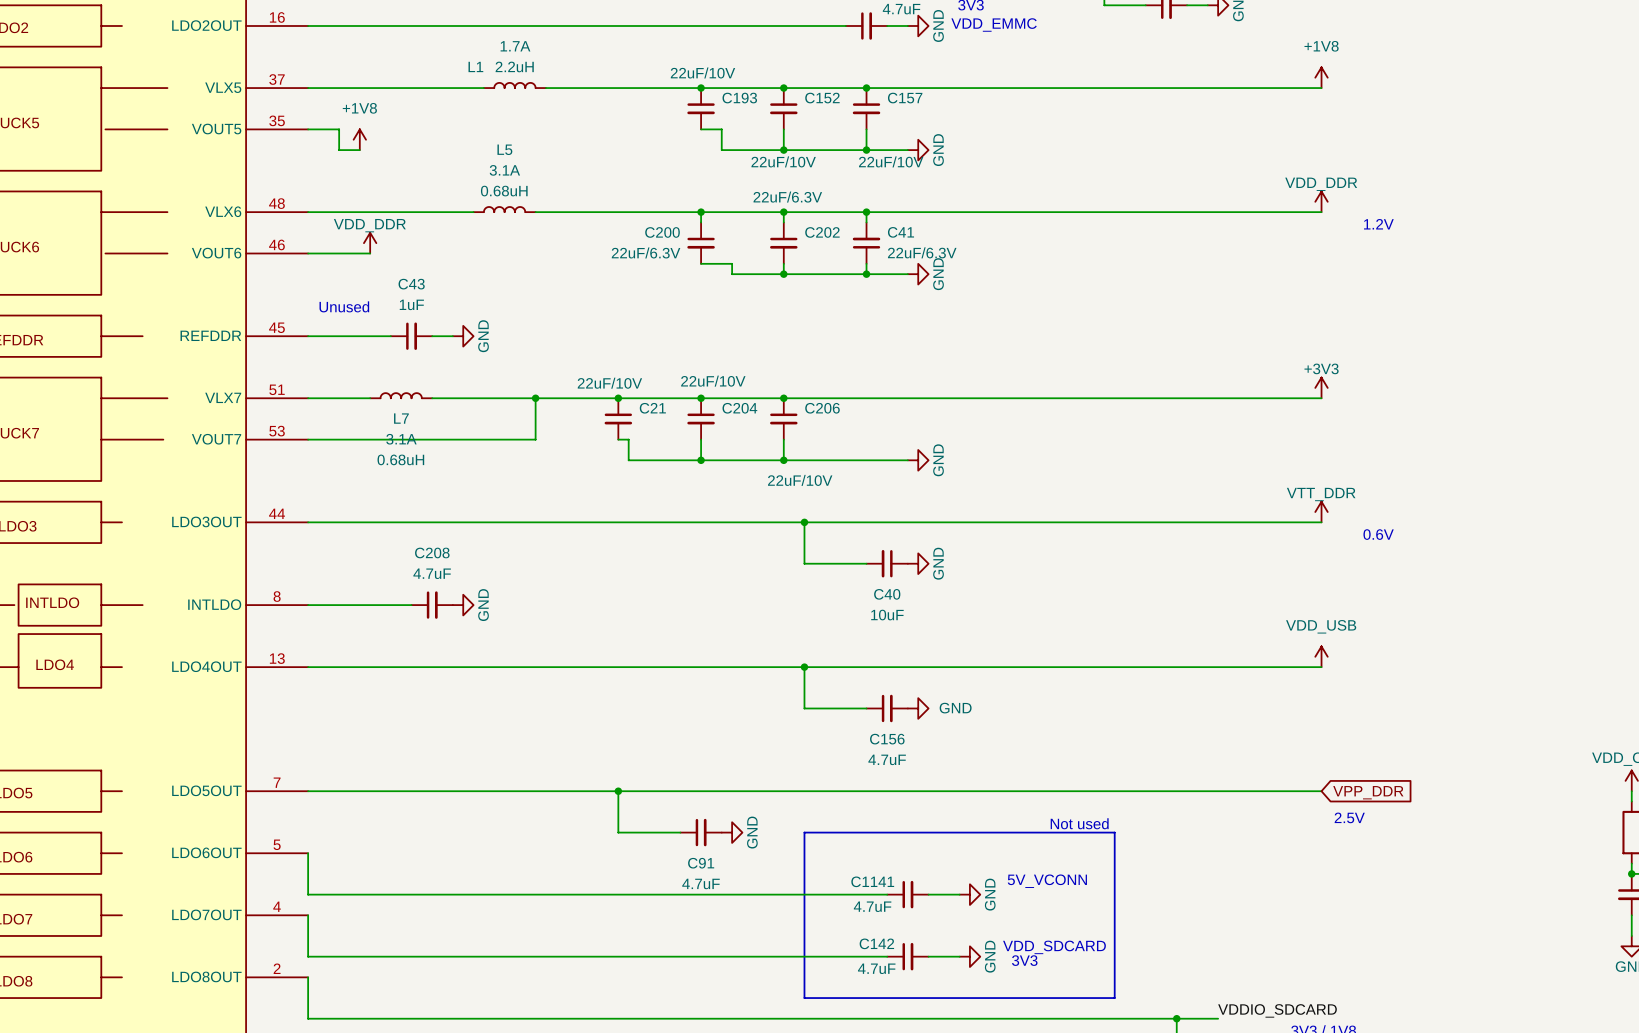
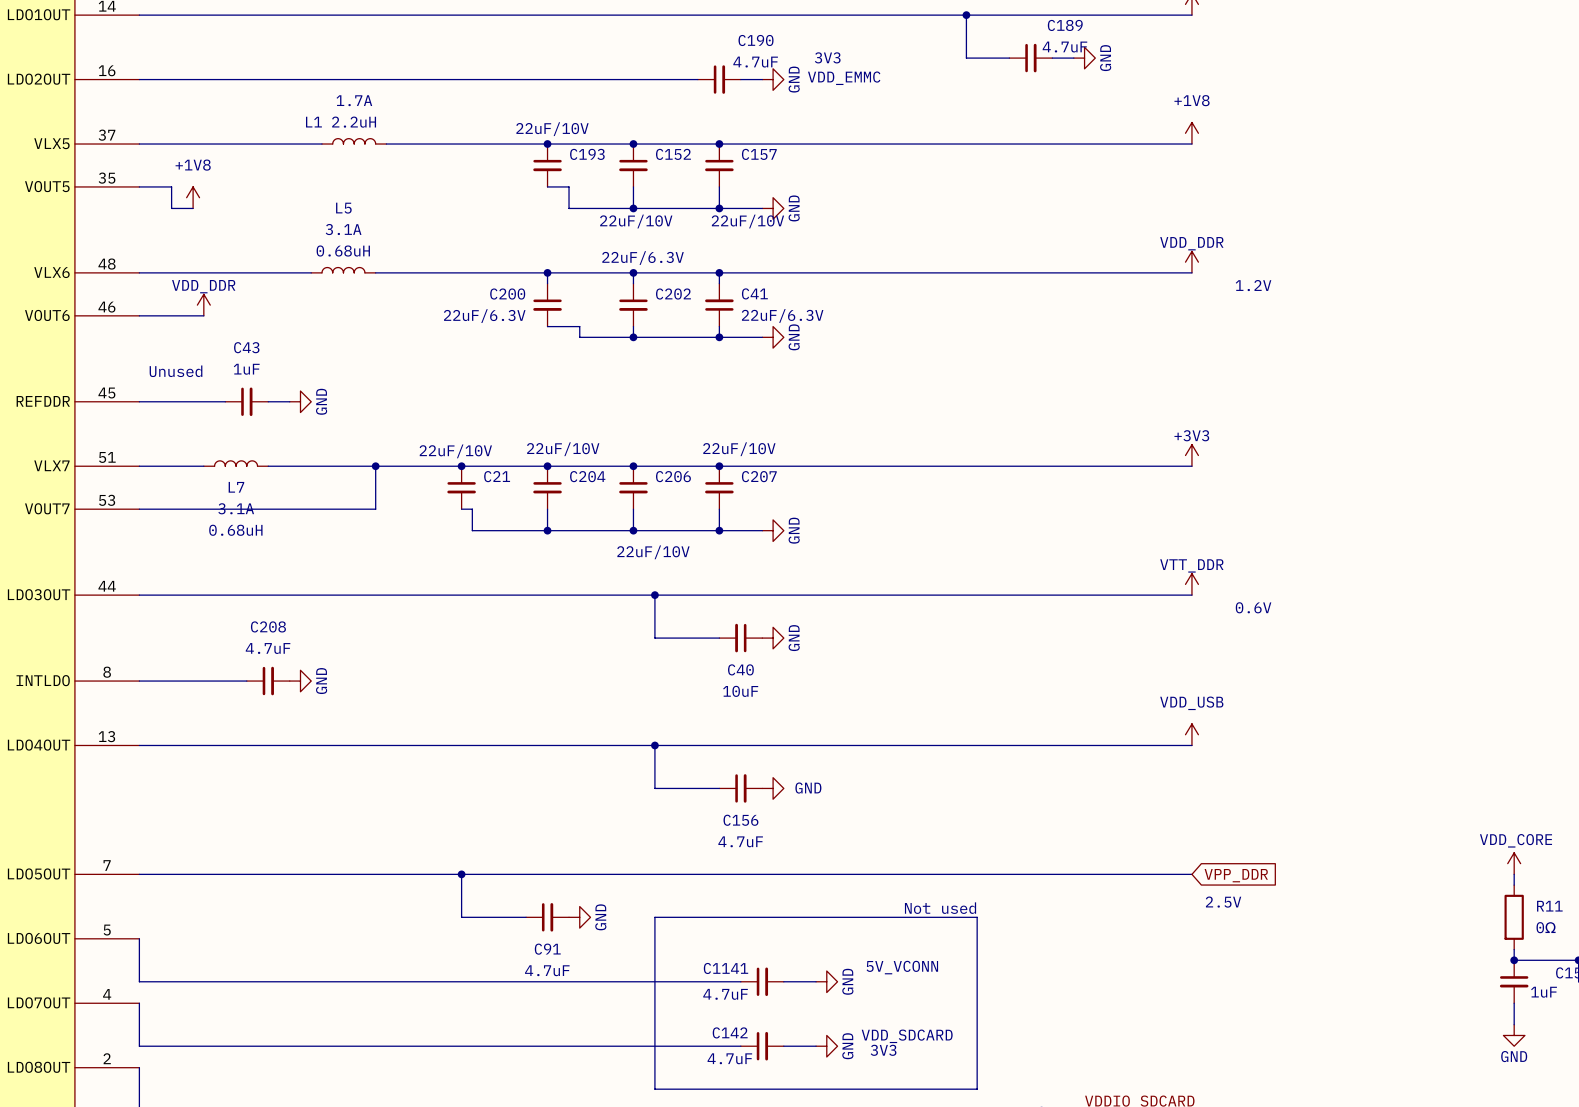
junction: none -> (719, 466)
C207: none -> (719, 487)
wire: none -> (719, 509) (719, 530)
junction: none -> (719, 530)

